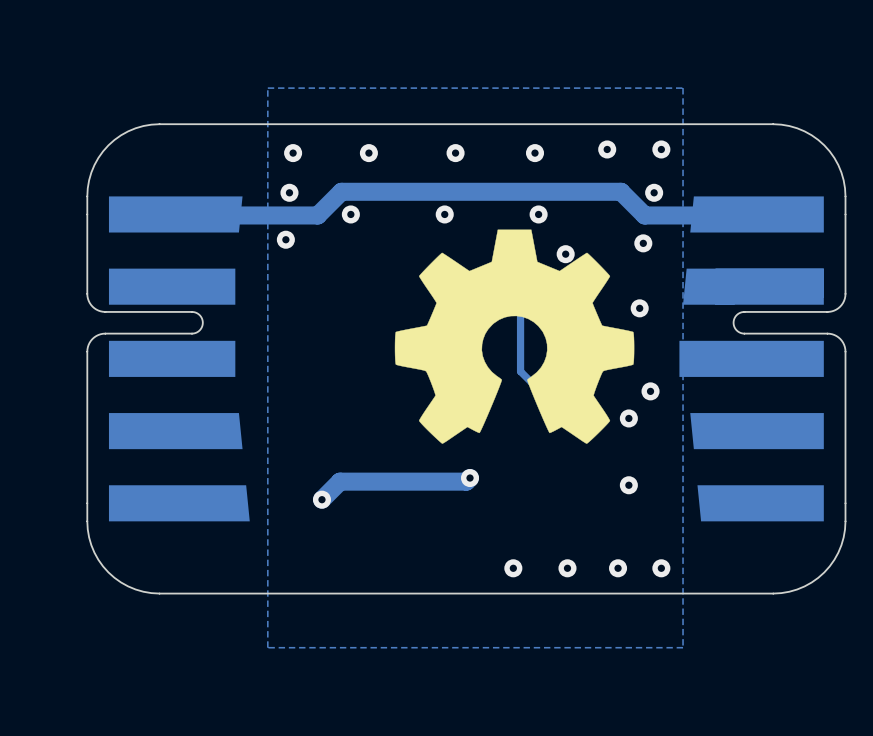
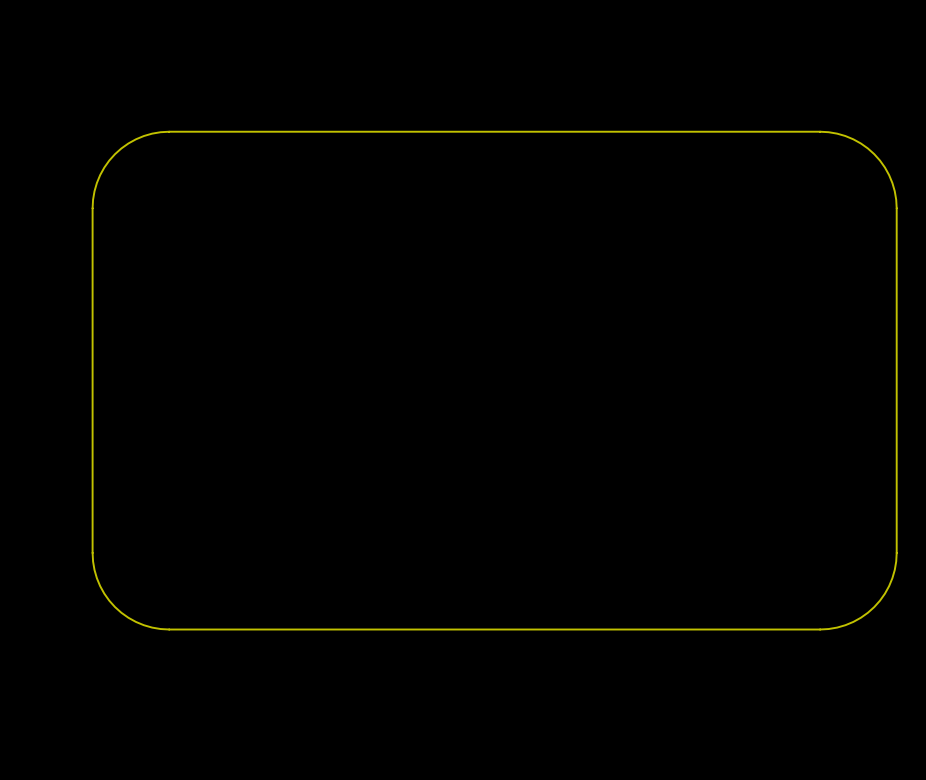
zone outline: (683, 88) (267, 88) (267, 647) (683, 647) (683, 88) -> none
via: (607, 149) -> none
via: (661, 149) -> none
via: (293, 153) -> none
via: (368, 153) -> none
via: (455, 153) -> none
via: (535, 153) -> none
via: (289, 192) -> none
via: (654, 192) -> none
board edge: none -> (92, 227) (92, 533)
via: (350, 214) -> none
via: (444, 214) -> none
via: (538, 214) -> none
track: (758, 214) (644, 215) (621, 191) (341, 191) (317, 215) (173, 214) -> none
board edge: none -> (896, 227) (896, 533)
drawing: [394, 229, 635, 444] -> none
via: (285, 239) -> none
via: (643, 243) -> none
via: (565, 254) -> none
track: (520, 277) (520, 371) (563, 414) -> none
via: (639, 308) -> none
part: (168, 358) -> none
part: (762, 358) -> none
via: (650, 391) -> none
via: (628, 418) -> none
track: (470, 478) (466, 481) (340, 481) (321, 499) -> none
via: (470, 478) -> none
via: (628, 485) -> none
via: (321, 499) -> none
via: (513, 568) -> none
via: (567, 568) -> none
via: (618, 568) -> none
via: (661, 568) -> none

